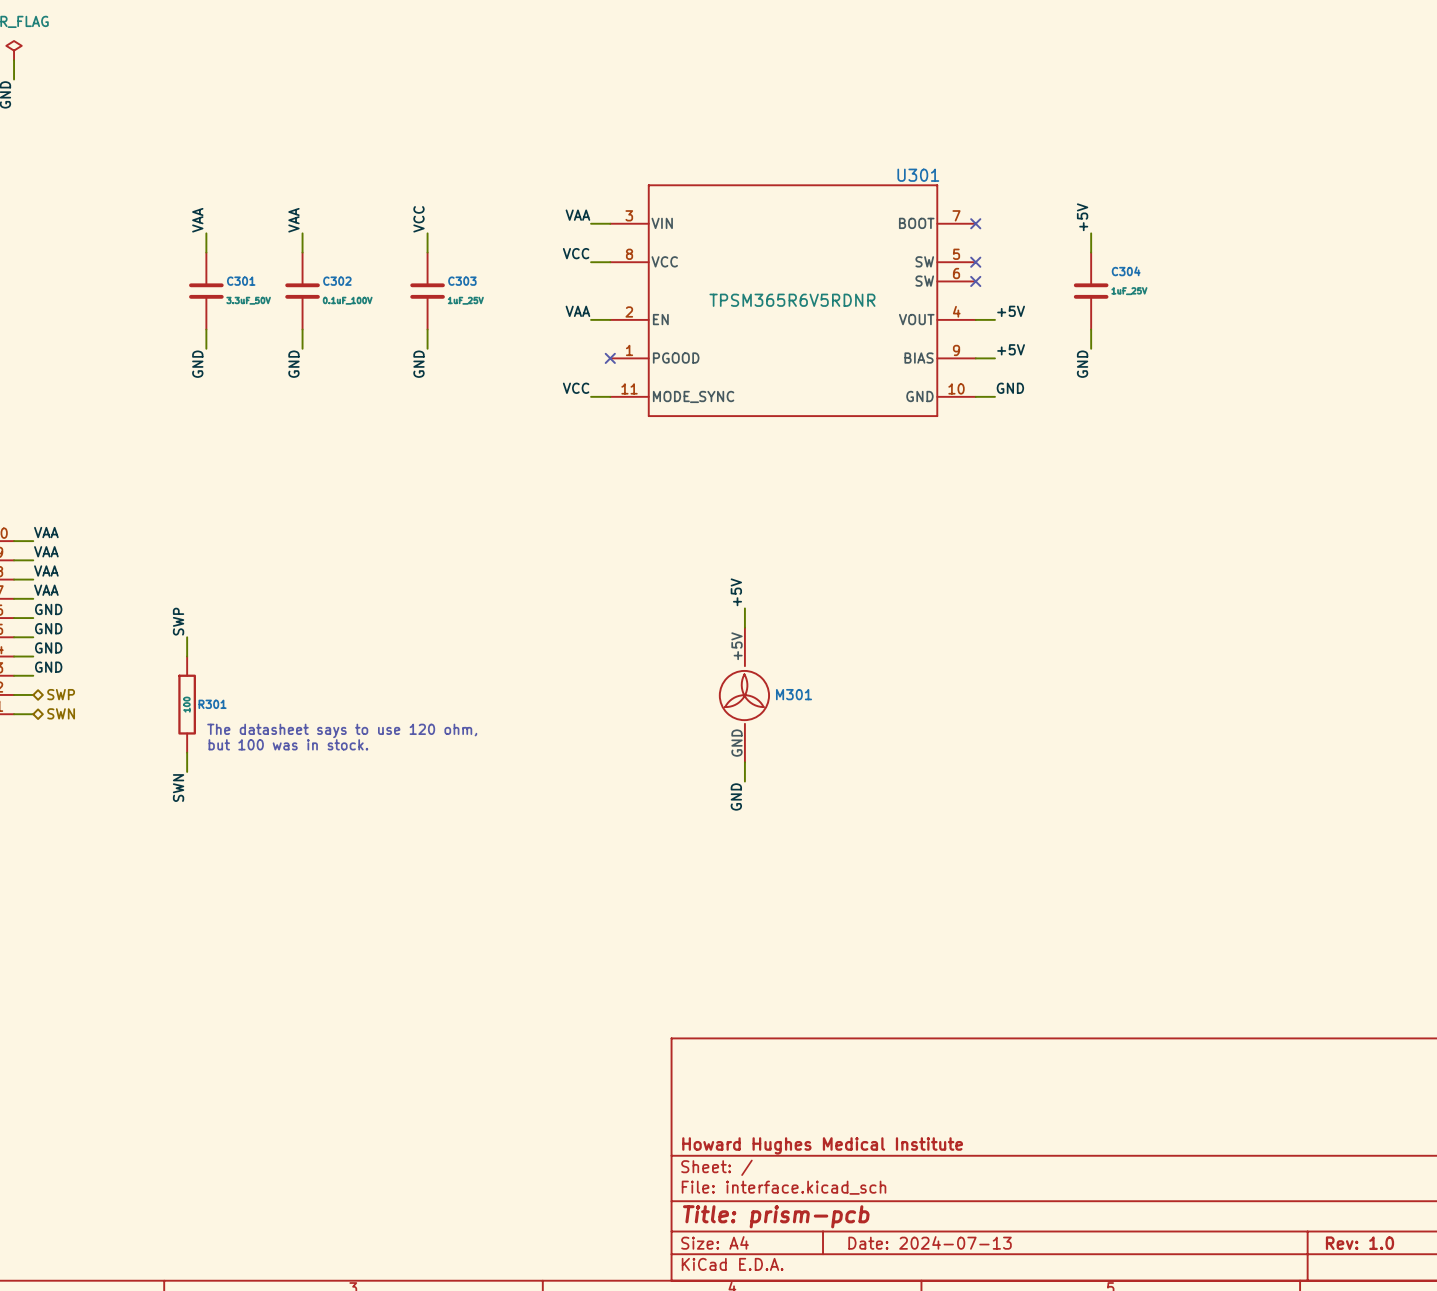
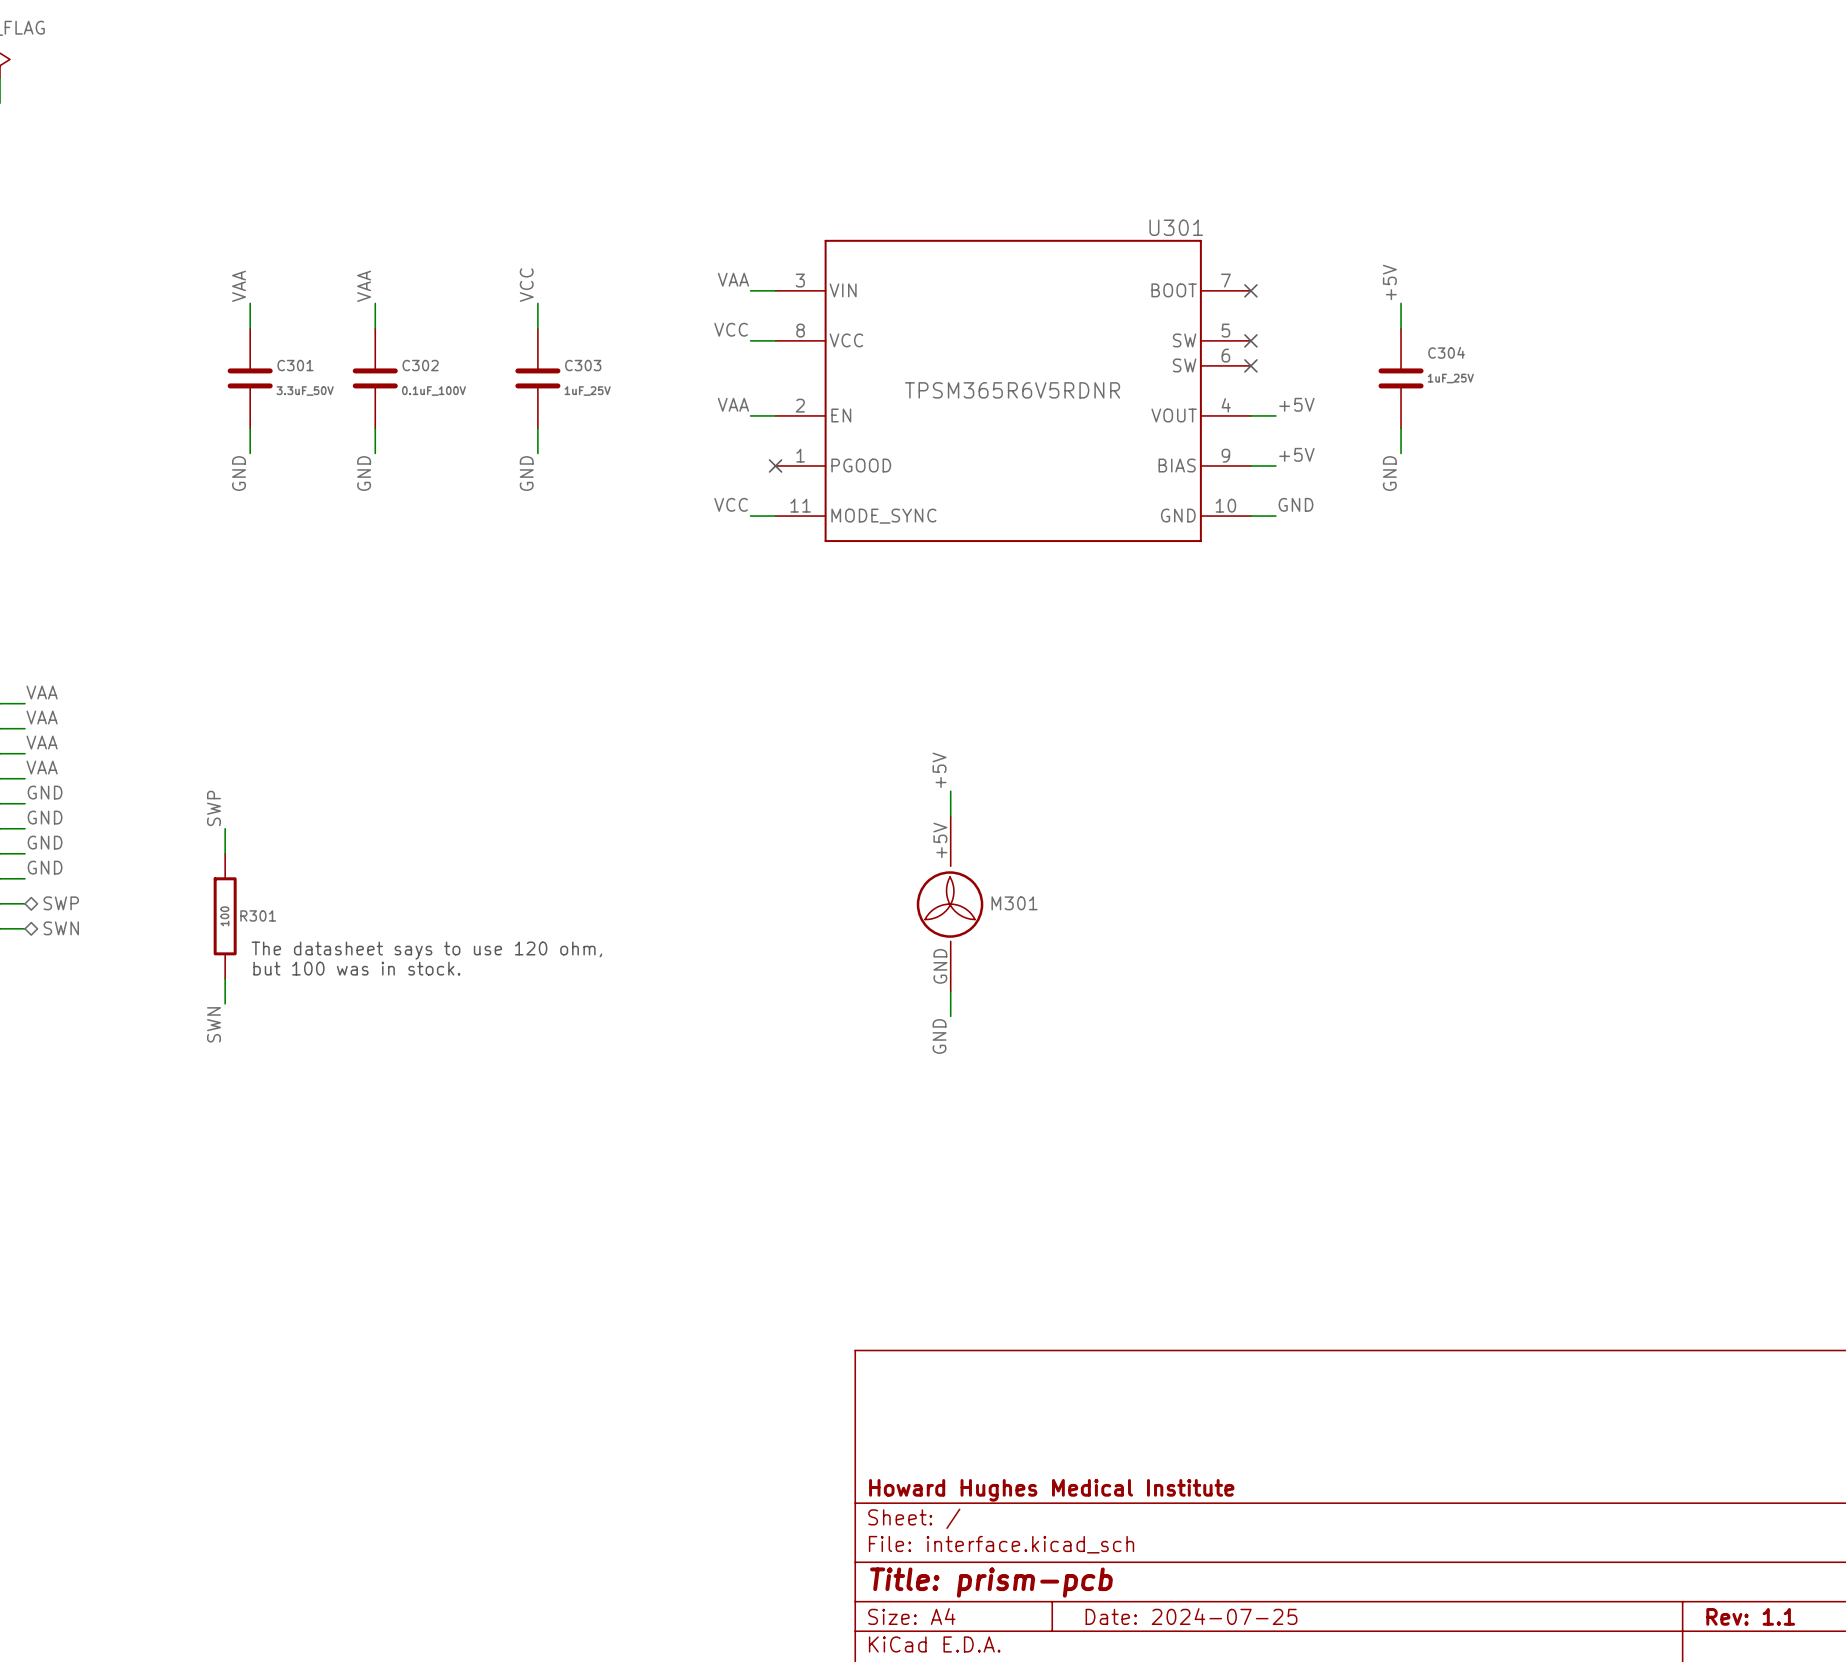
title block: Date: 2024-07-13 (930, 1242) -> Date: 2024-07-25 (1191, 1616)
title block: Rev: 1.0 (1359, 1243) -> Rev: 1.1 (1750, 1616)

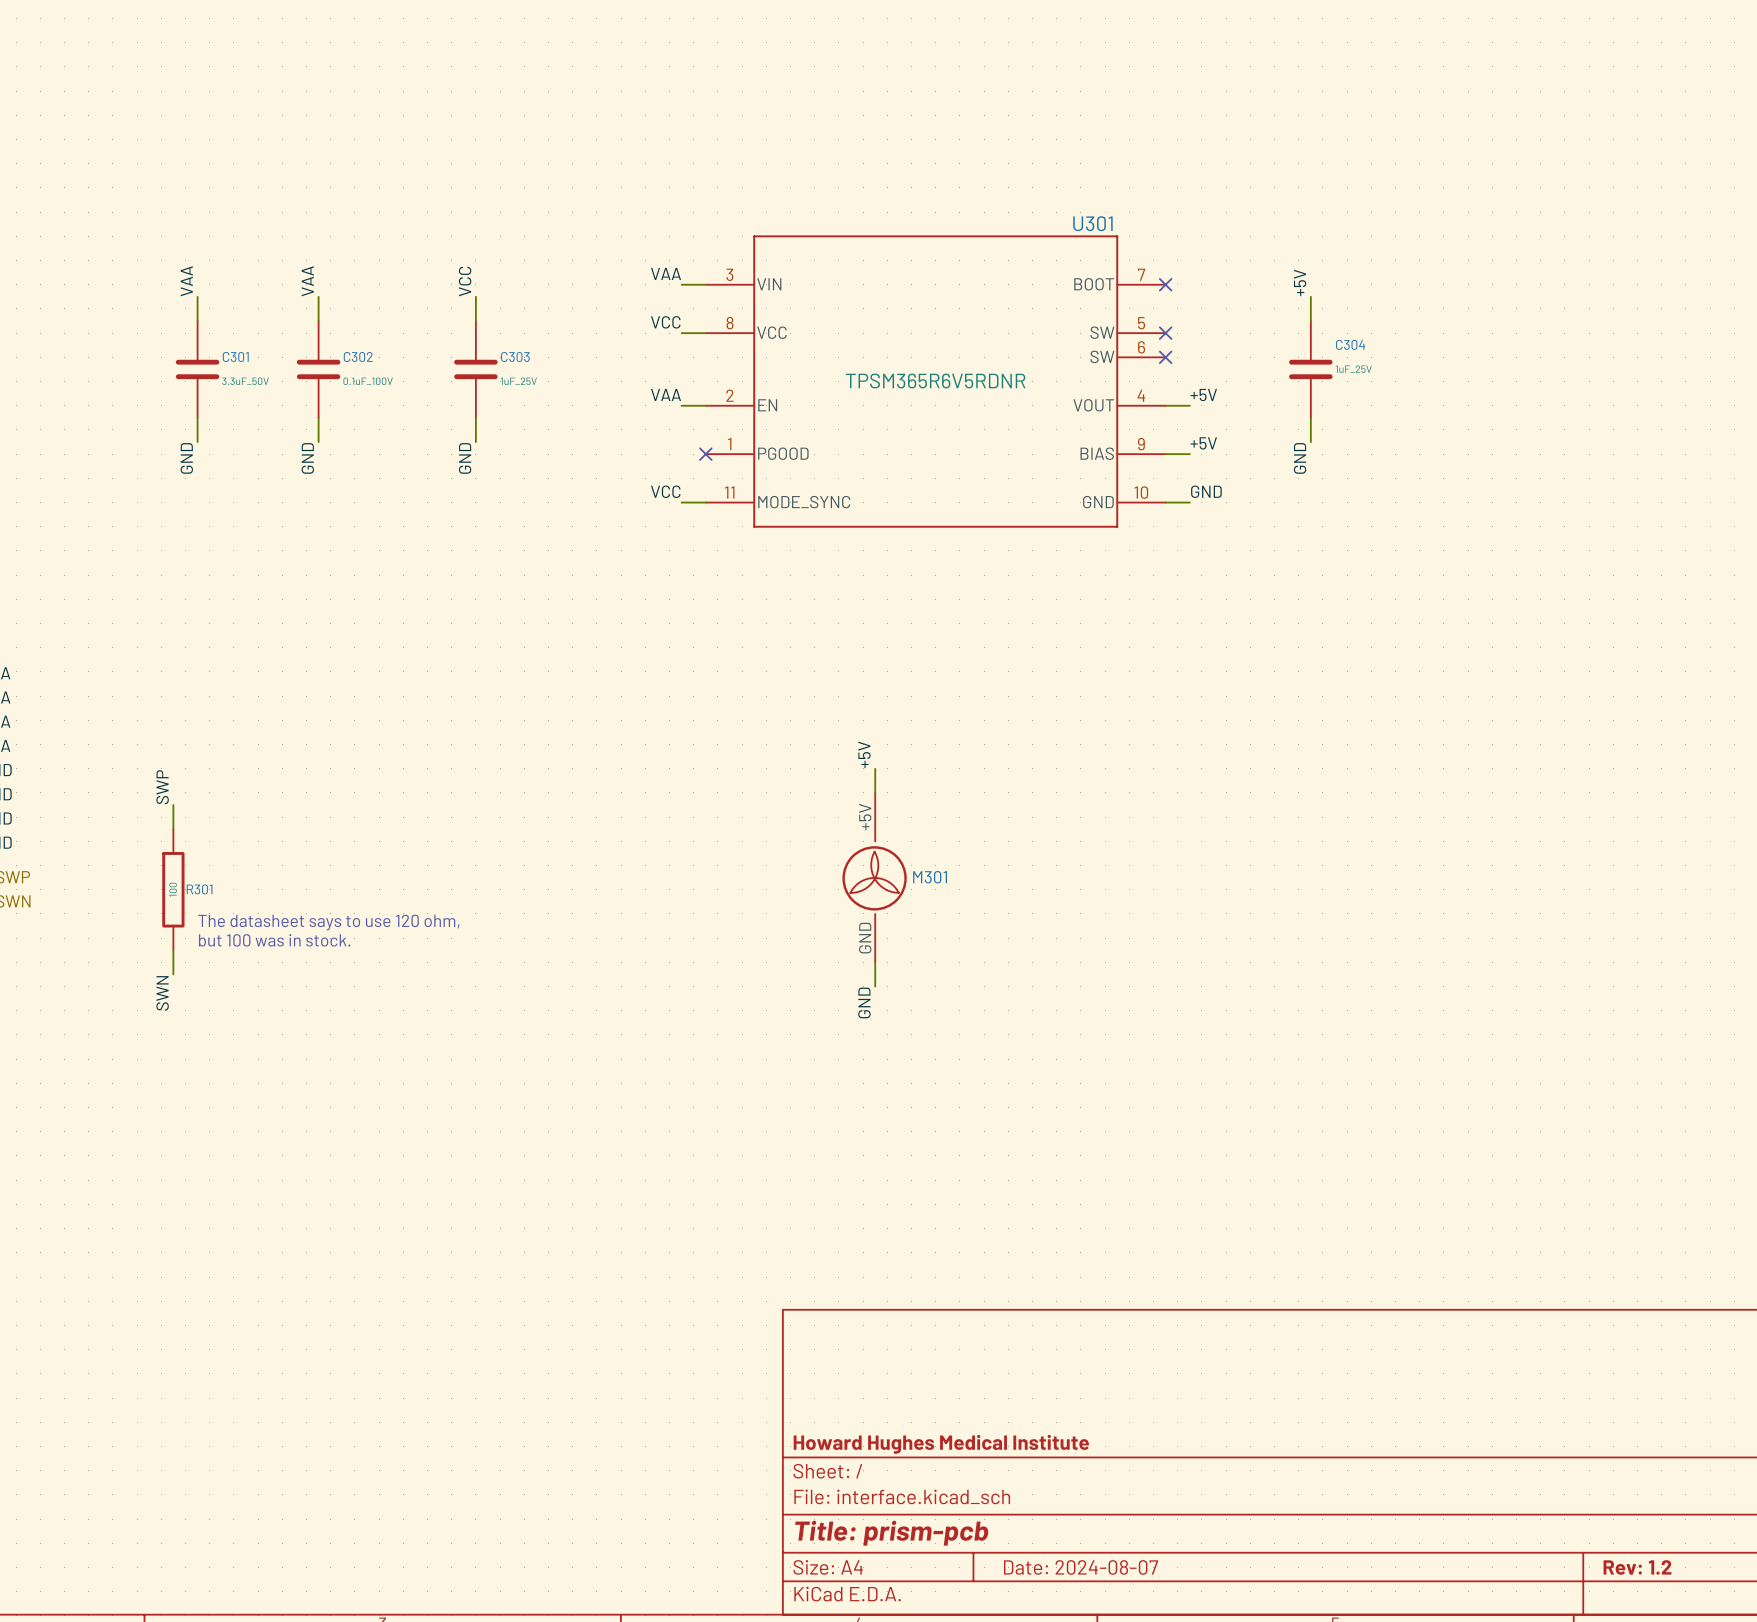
title block: Date: 2024-07-25 (1191, 1616) -> Date: 2024-08-07 (1081, 1567)
title block: Rev: 1.1 (1750, 1616) -> Rev: 1.2 (1637, 1567)

